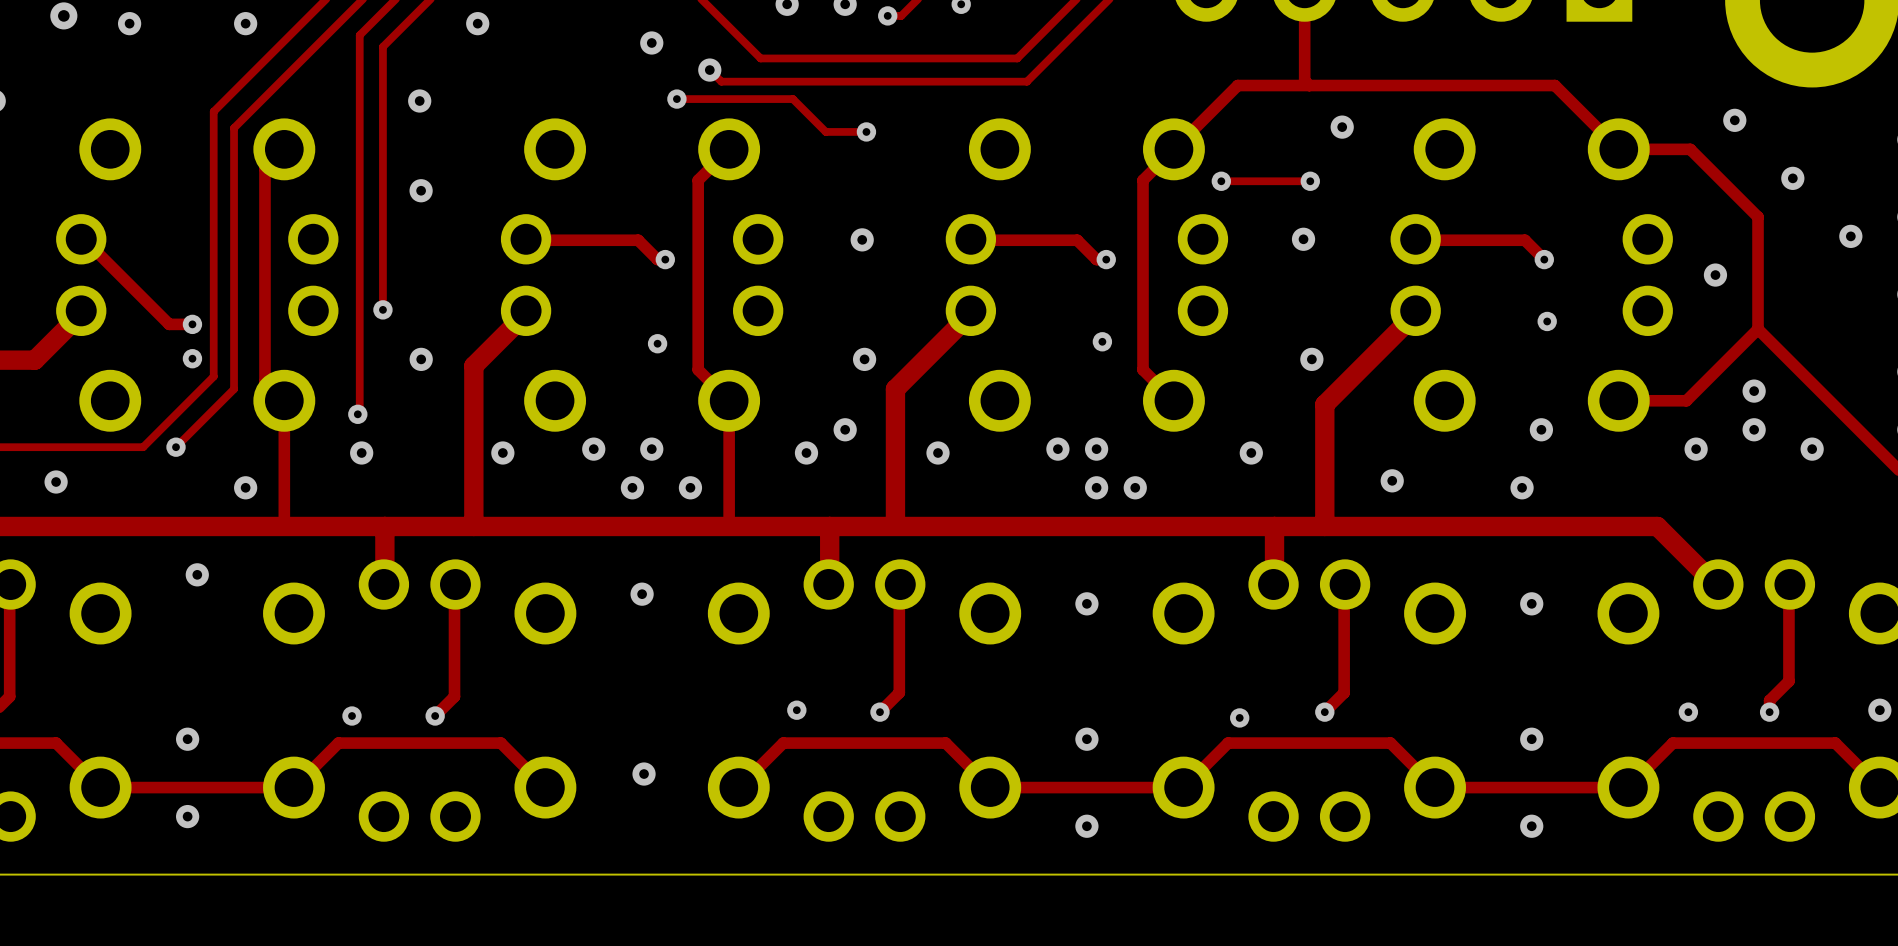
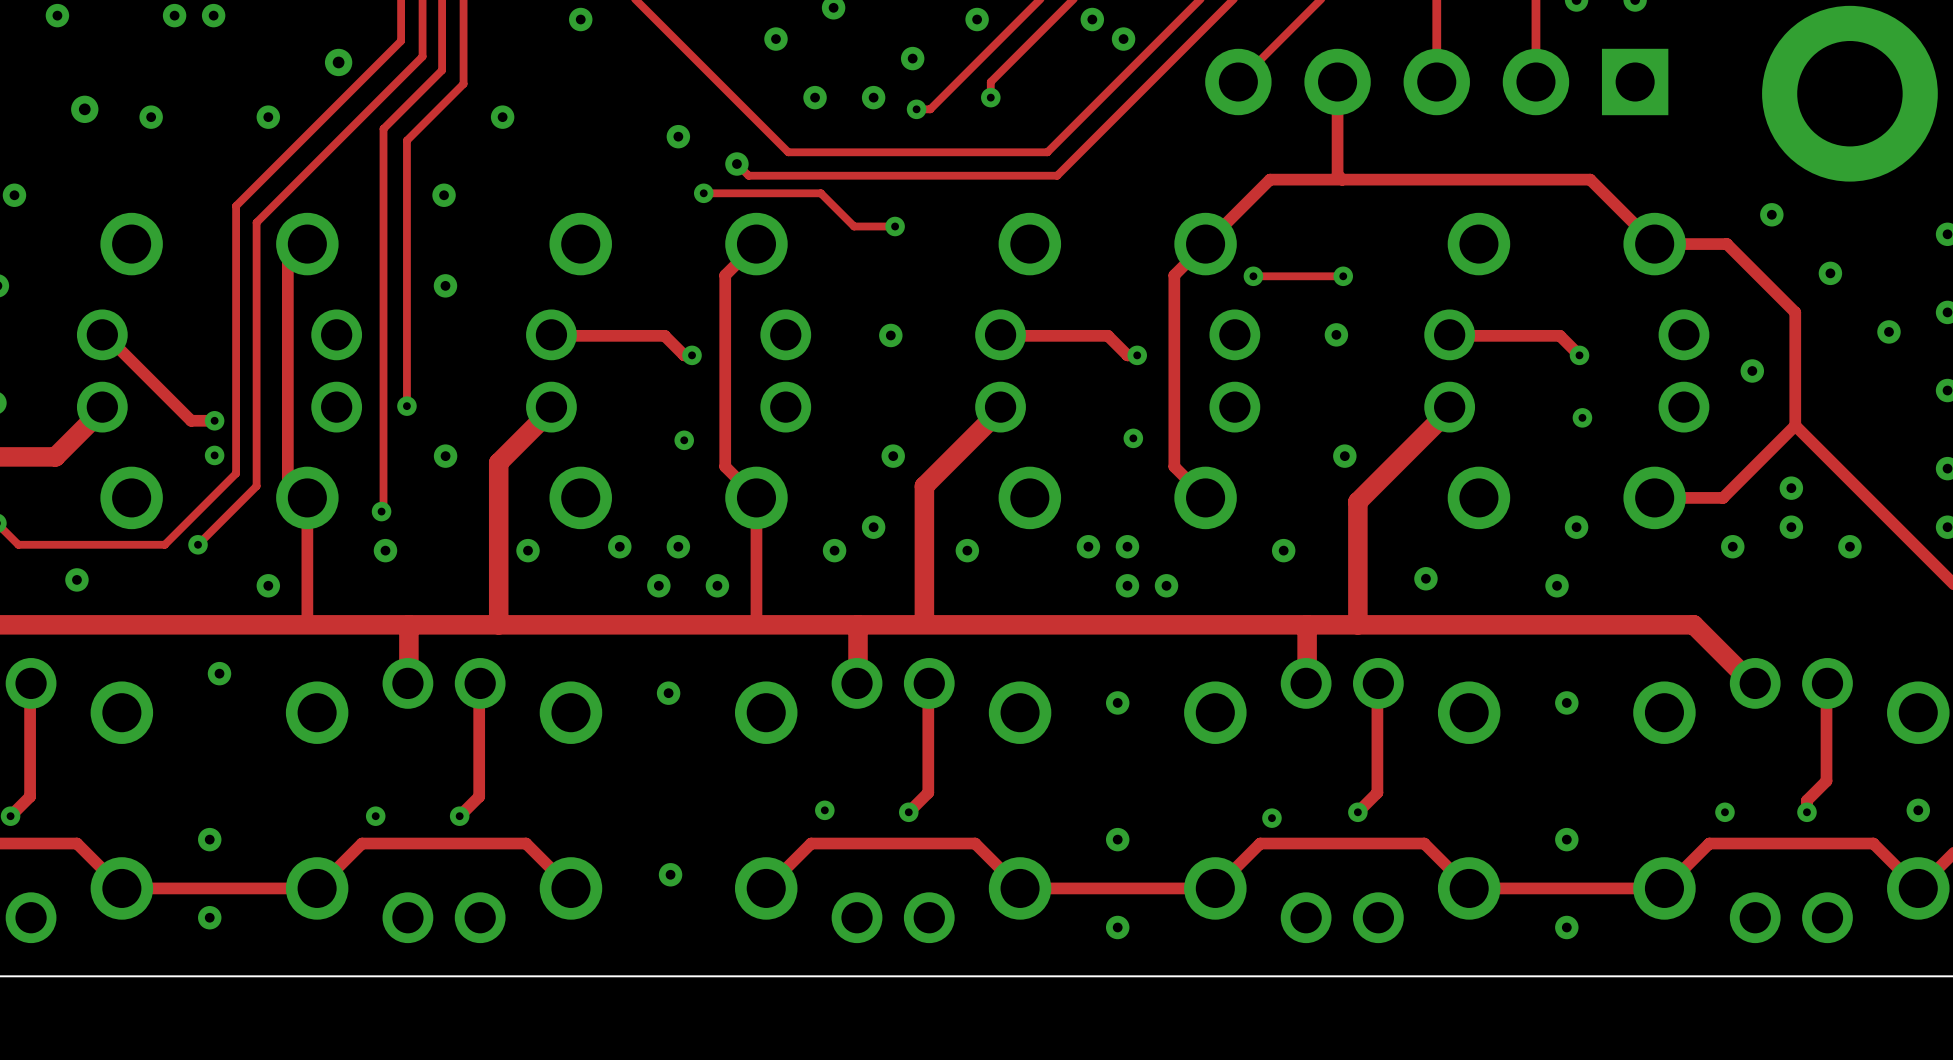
via: (1342, 127) -> none

